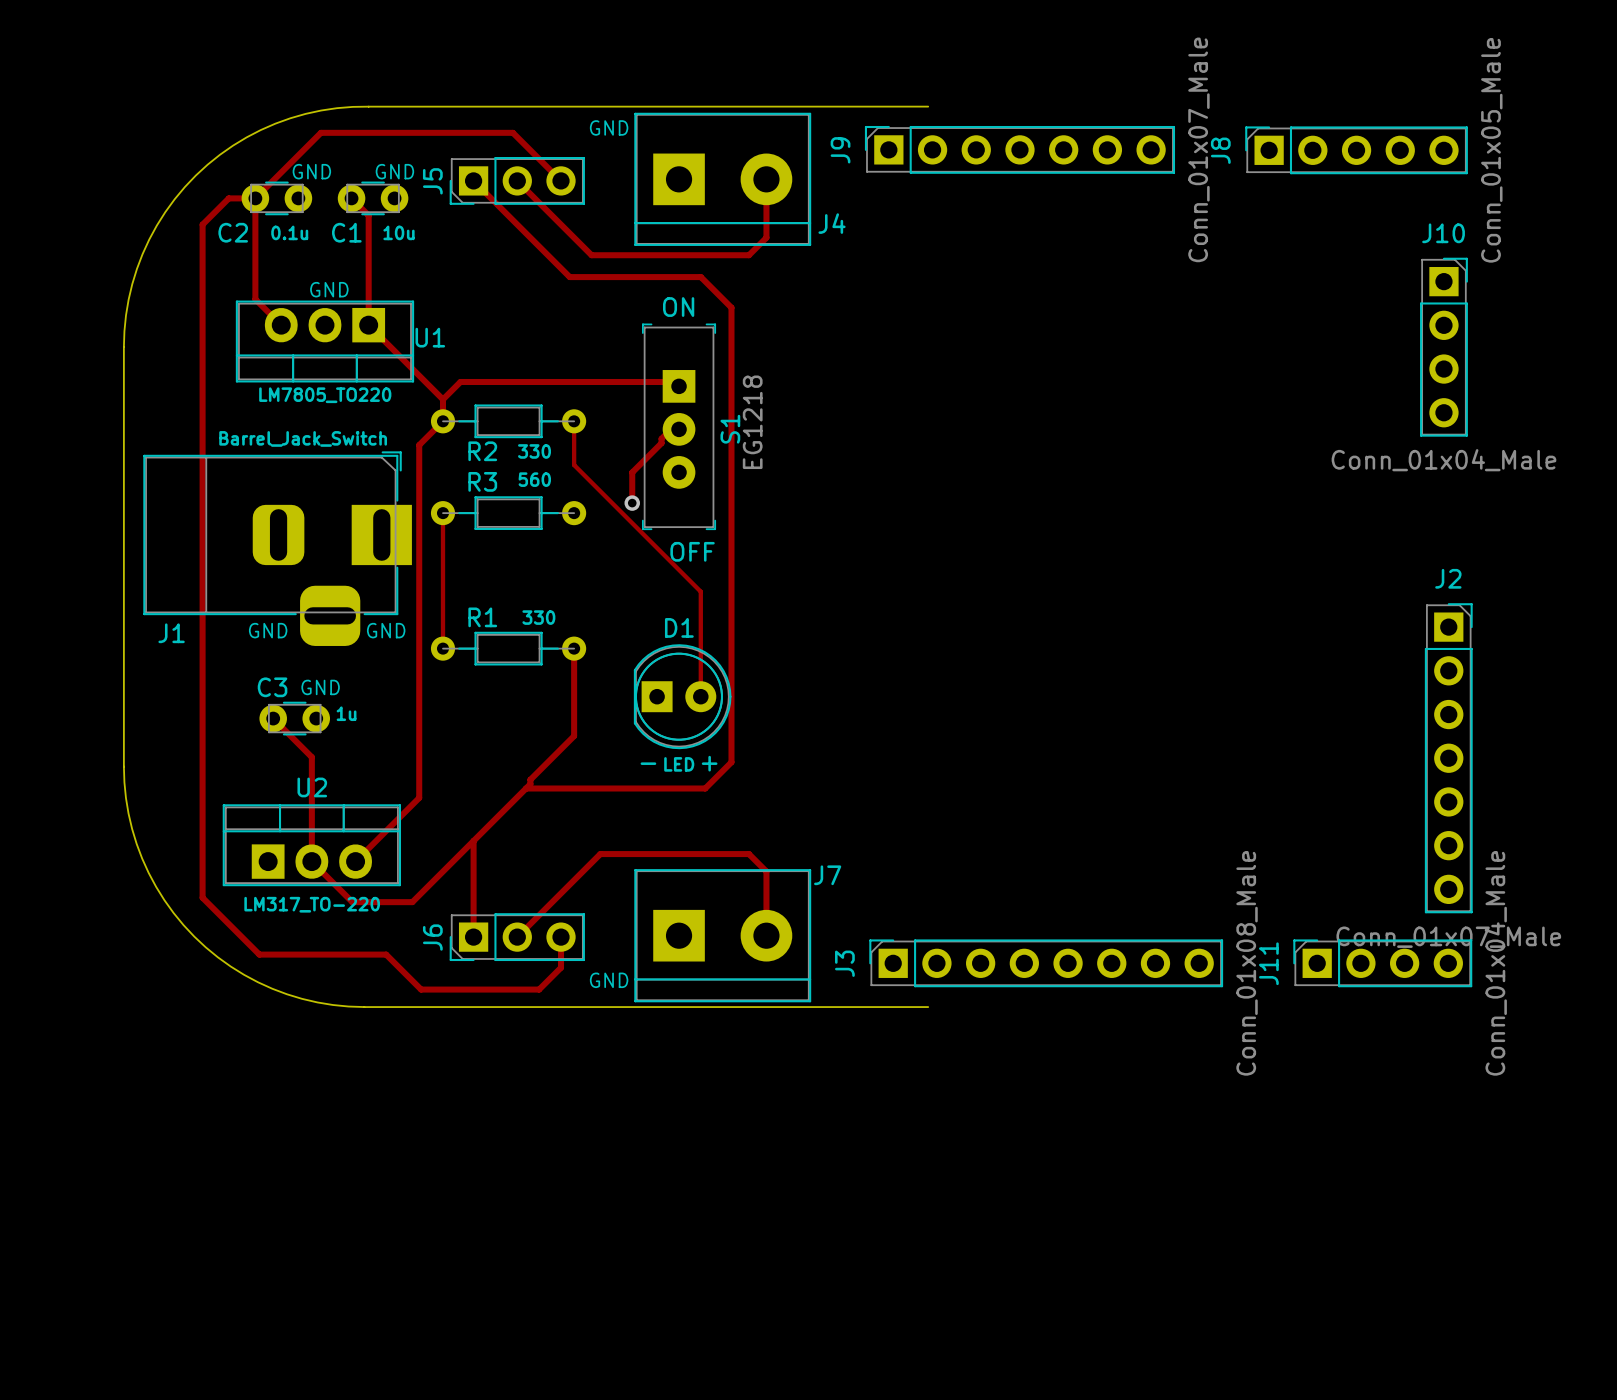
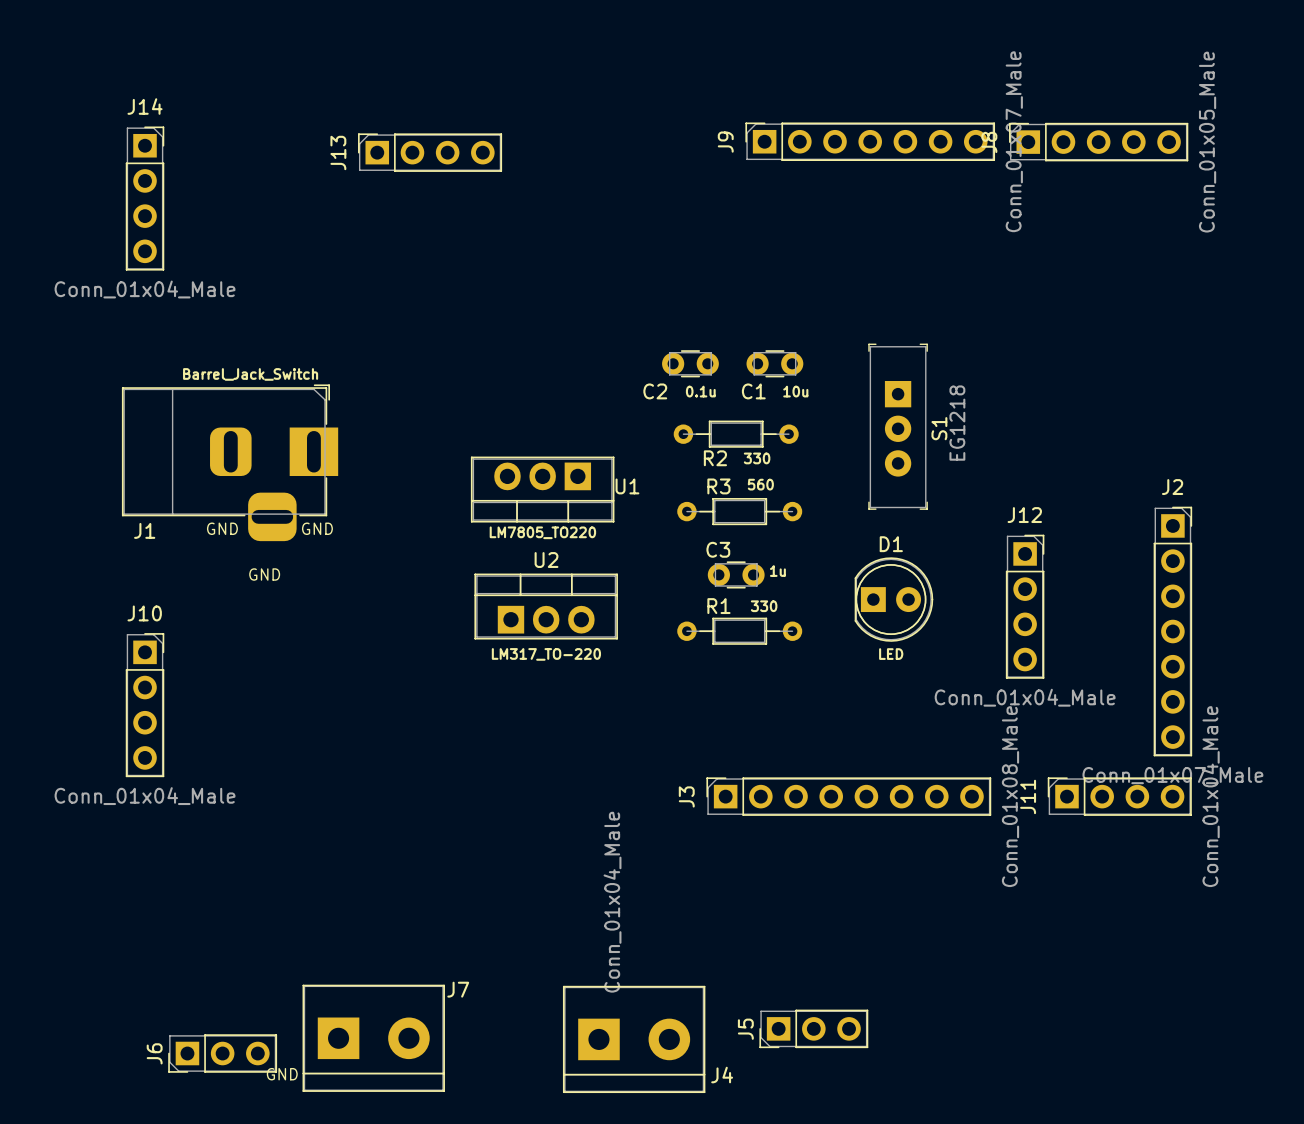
board edge: (928, 106) (352, 106) (321, 110) (290, 118) (260, 130) (220, 154) (195, 175) (165, 212) (149, 239) (136, 268) (126, 315) (123, 347) (123, 766) (125, 798) (136, 843) (156, 886) (183, 925) (217, 957) (257, 982) (287, 994) (317, 1002) (348, 1006) (928, 1007) -> none
text: GND (609, 127) -> none
J9 position: (1019, 149) -> (870, 141)
J13: none -> Conn_01x04_Male (430, 152)
text: GND (311, 171) -> none
text: GND (394, 171) -> none
J4 position: (722, 179) -> (634, 1039)
track: (473, 180) (569, 277) (700, 277) (731, 307) (731, 762) (705, 788) (526, 788) -> none
track: (517, 180) (591, 255) (748, 255) (766, 237) (766, 179) (772, 185) -> none
J5 position: (517, 180) -> (813, 1028)
track: (561, 180) (512, 132) (320, 132) (255, 198) -> none
track: (255, 198) (228, 198) (202, 224) (202, 897) (259, 954) (386, 954) (421, 989) (539, 989) (561, 967) (561, 937) -> none
track: (255, 198) (255, 299) (281, 325) -> none
C2 position: (276, 198) -> (690, 363)
track: (351, 198) (368, 215) (368, 325) (443, 399) -> none
C1 position: (373, 198) -> (774, 363)
J14: none -> Conn_01x04_Male (145, 198)
text: GND (329, 289) -> none
text: ON (678, 307) -> none
U1 position: (324, 341) -> (542, 489)
J10 position: (1443, 347) -> (145, 705)
track: (679, 386) (674, 381) (460, 381) (443, 399) -> none
track: (443, 399) (443, 421) (419, 445) (419, 797) (355, 861) -> none
R2 position: (508, 421) -> (736, 434)
track: (574, 421) (574, 465) (700, 591) (700, 696) -> none
S1 position: (679, 426) -> (898, 426)
track: (679, 429) (670, 429) (661, 438) (661, 443) (632, 472) (632, 503) -> none
via: (632, 503) -> none
track: (443, 513) (443, 648) -> none
R3 position: (508, 513) -> (739, 511)
text: OFF (692, 551) -> none
R1 position: (508, 648) -> (739, 631)
track: (574, 648) (574, 736) (530, 779) (530, 784) (412, 902) (352, 902) (311, 861) (311, 757) (273, 718) -> none
D1 position: (682, 696) -> (893, 599)
C3 position: (294, 718) -> (736, 574)
J12: none -> Conn_01x04_Male (1025, 606)
text: - (648, 763) -> none
text: + (709, 763) -> none
track: (473, 840) (473, 937) -> none
U2 position: (311, 845) -> (546, 606)
J7 position: (722, 935) -> (373, 1038)
track: (766, 935) (766, 871) (748, 854) (600, 854) (517, 937) -> none
J6 position: (517, 937) -> (222, 1053)
text position: GND (609, 980) -> GND (282, 1074)

